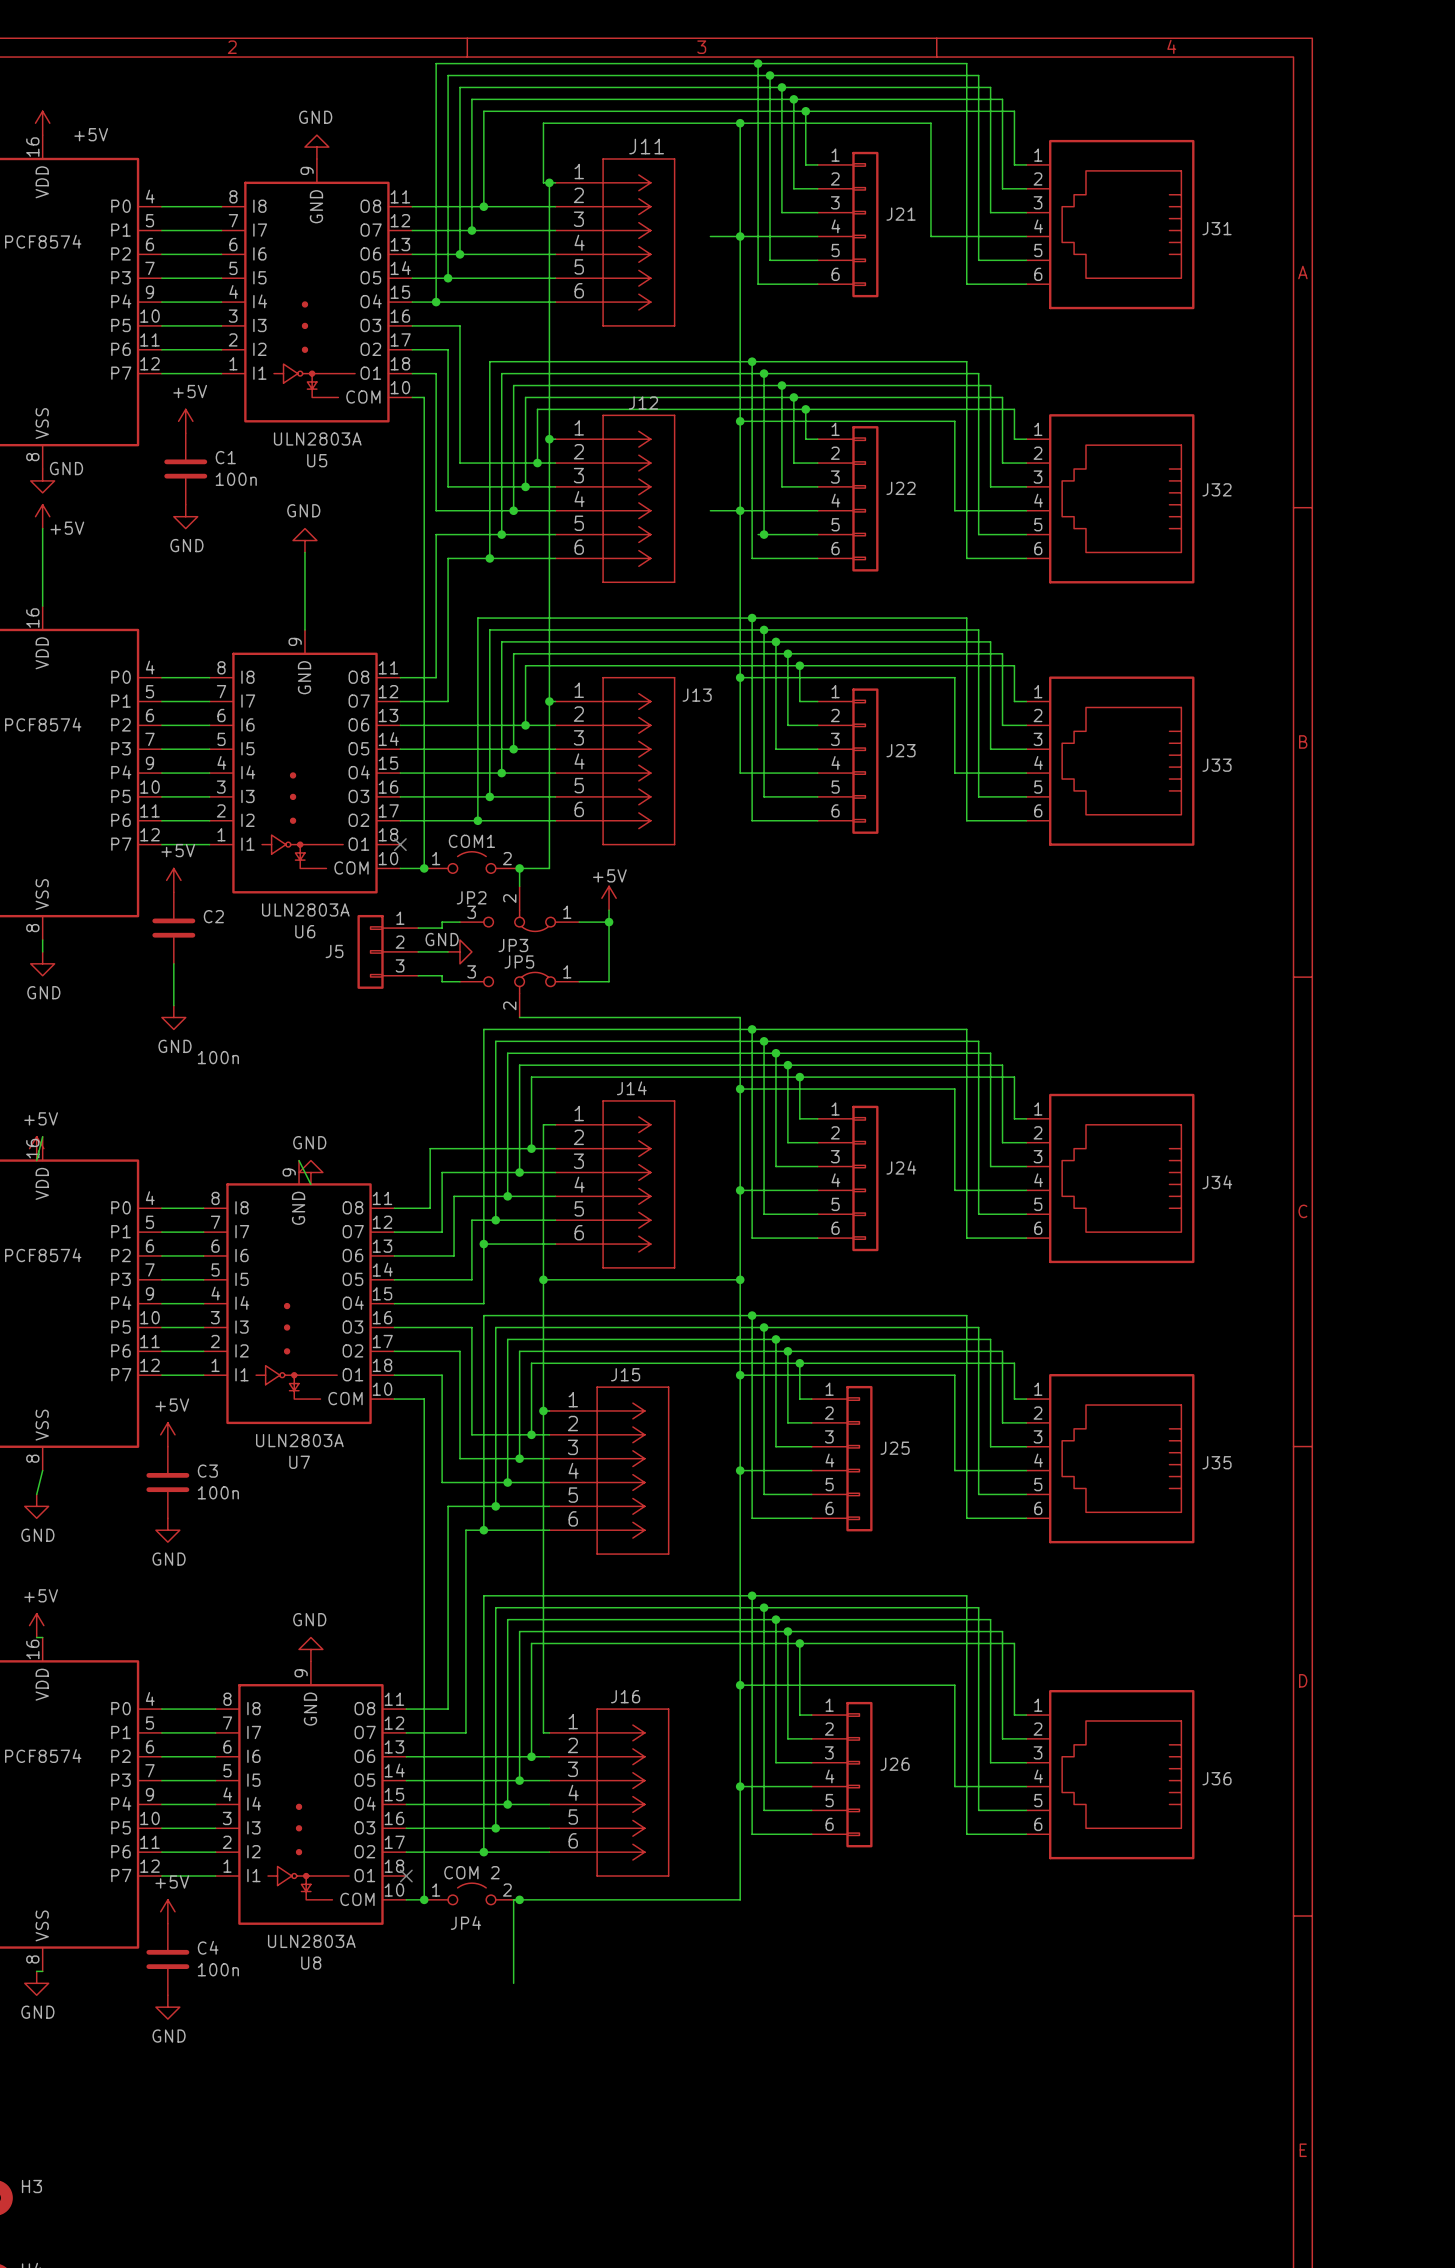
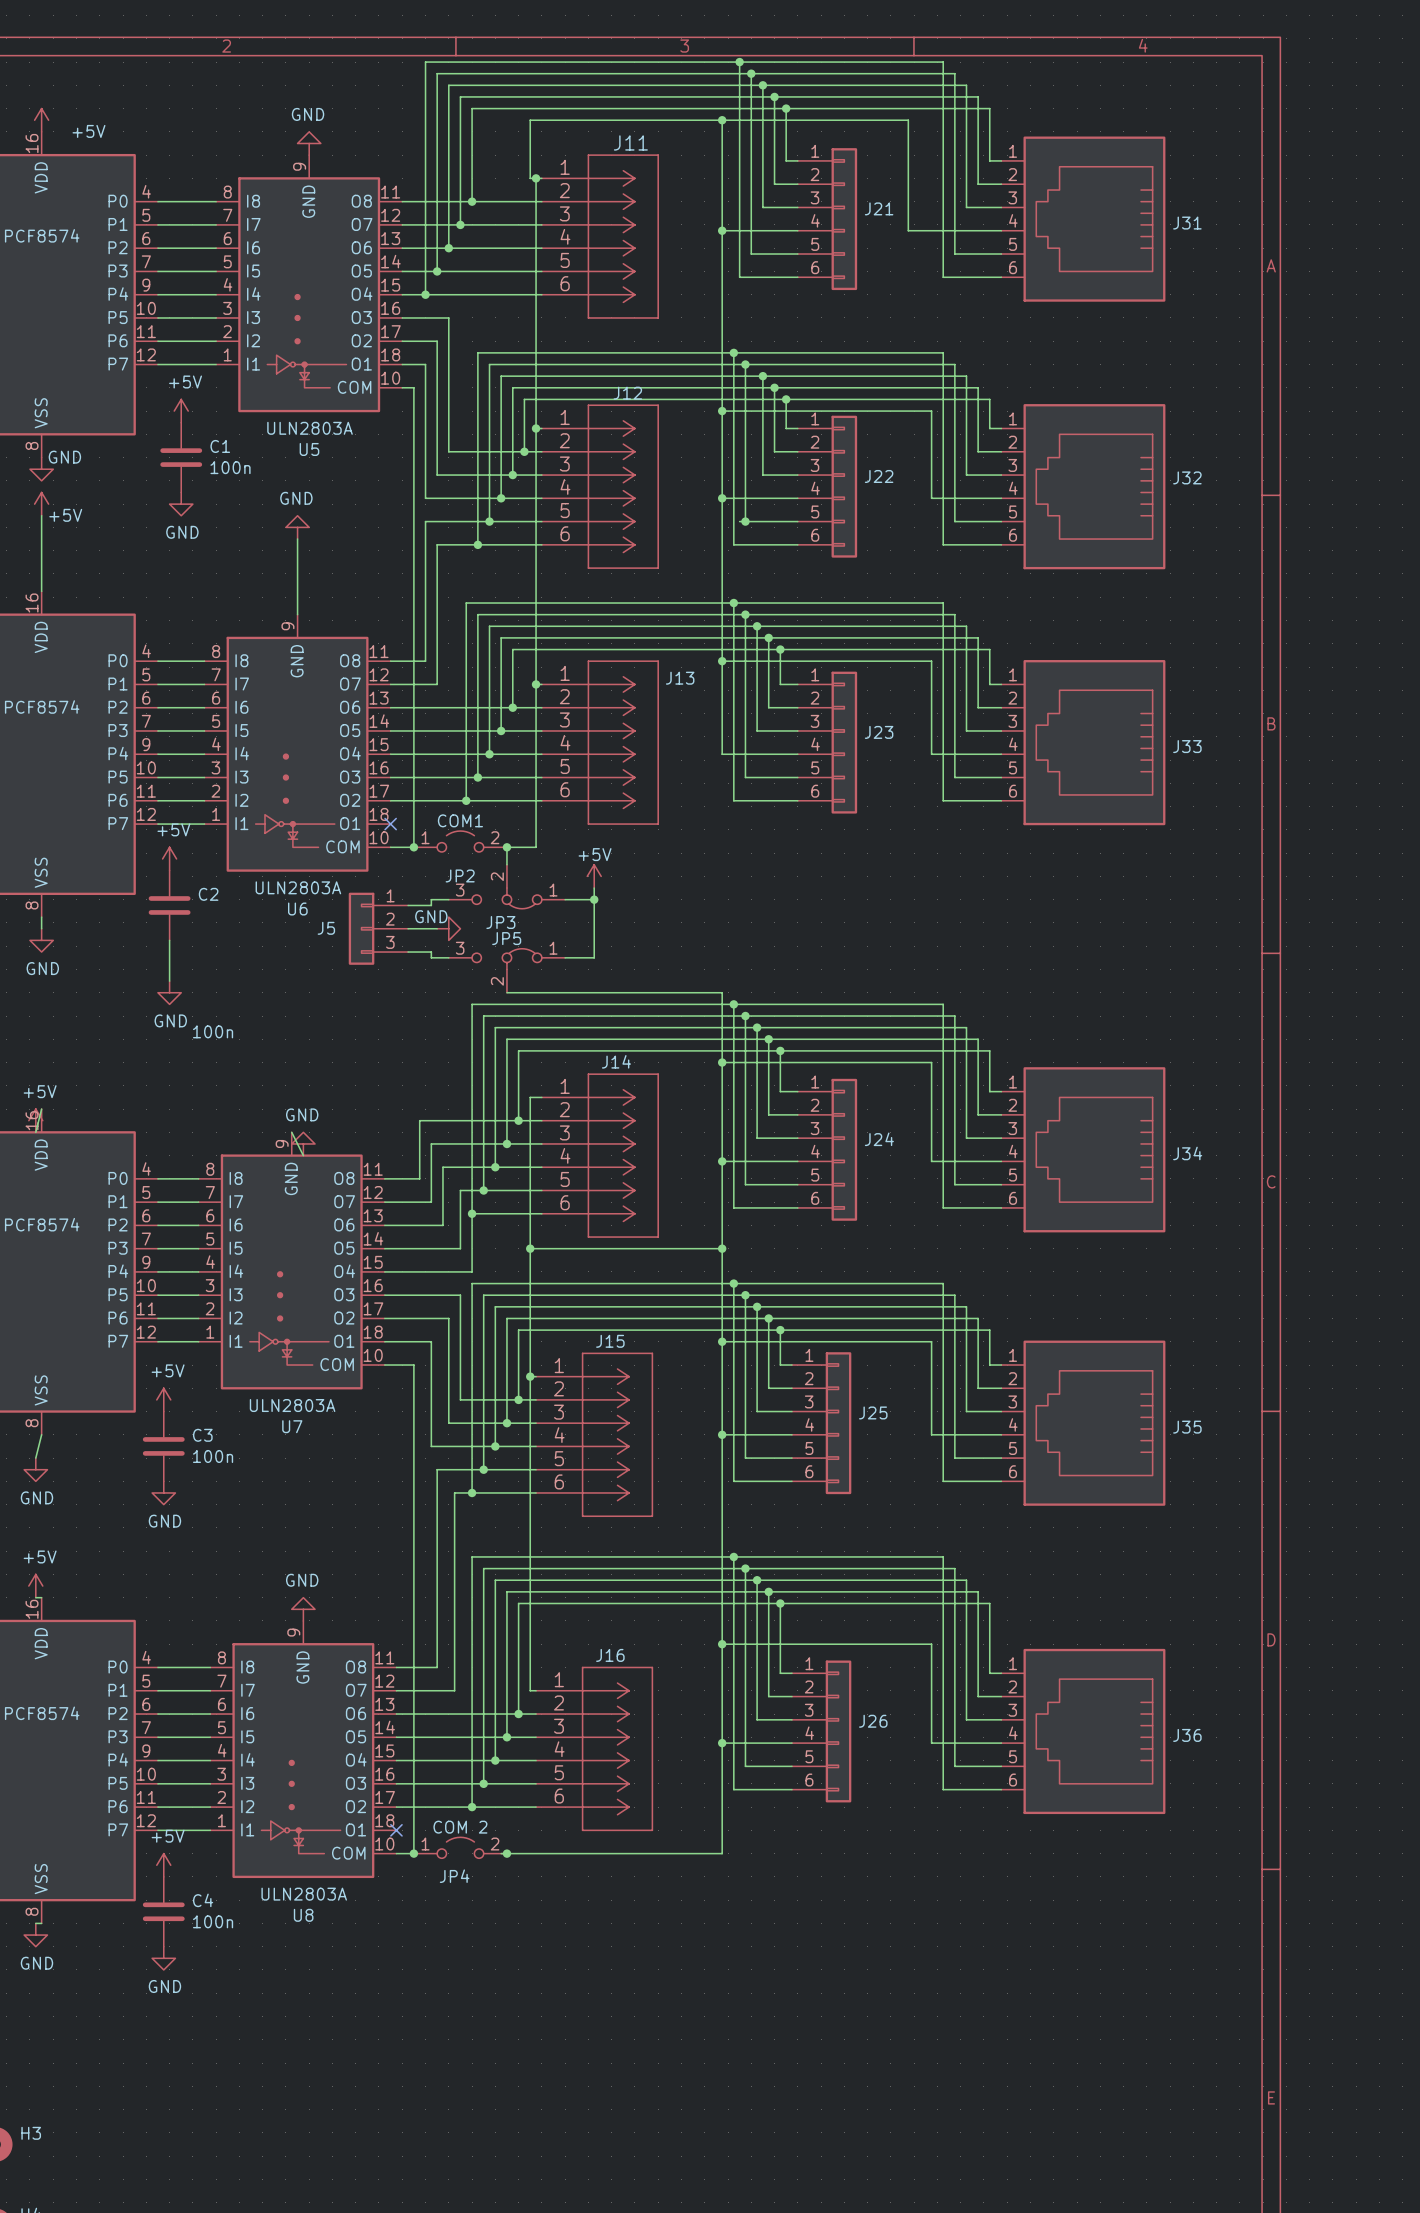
wire: (710, 236) (740, 236) -> none
wire: (710, 510) (740, 510) -> none
wire: (513, 1899) (513, 1983) -> none

